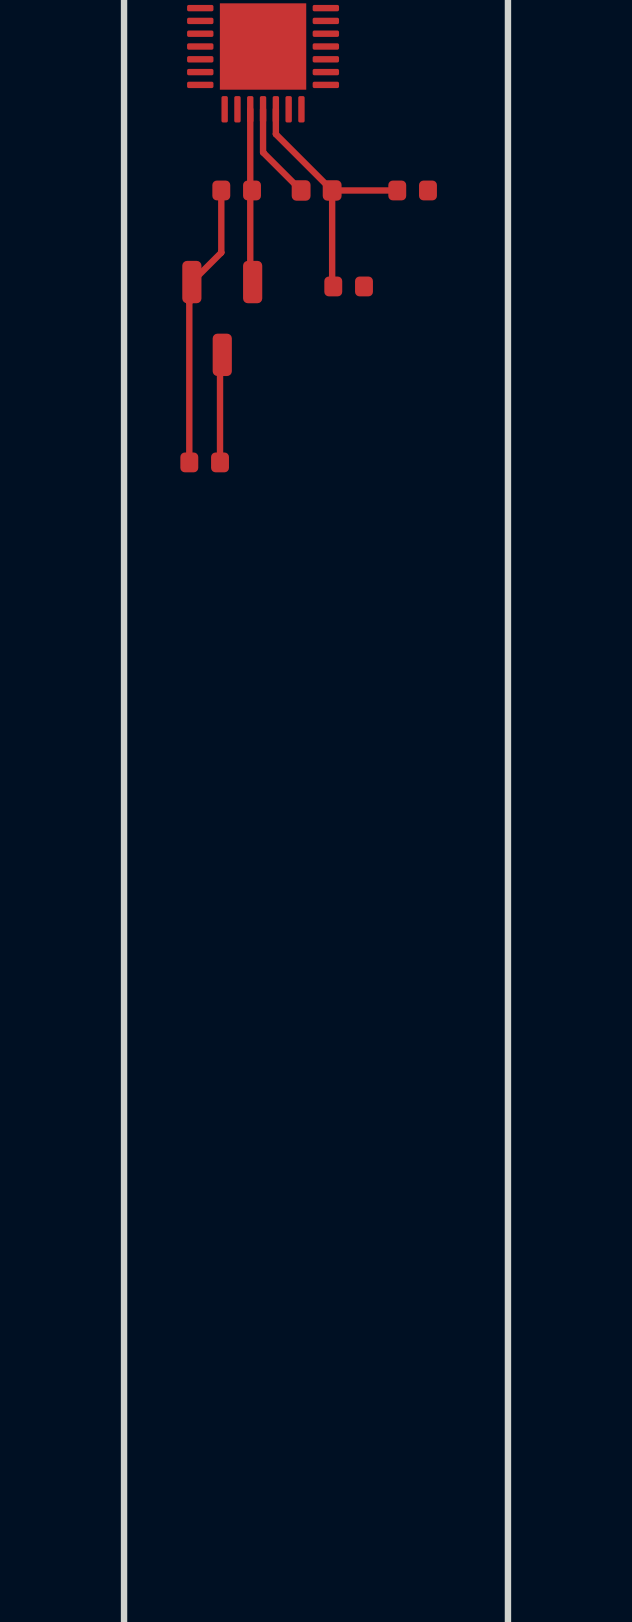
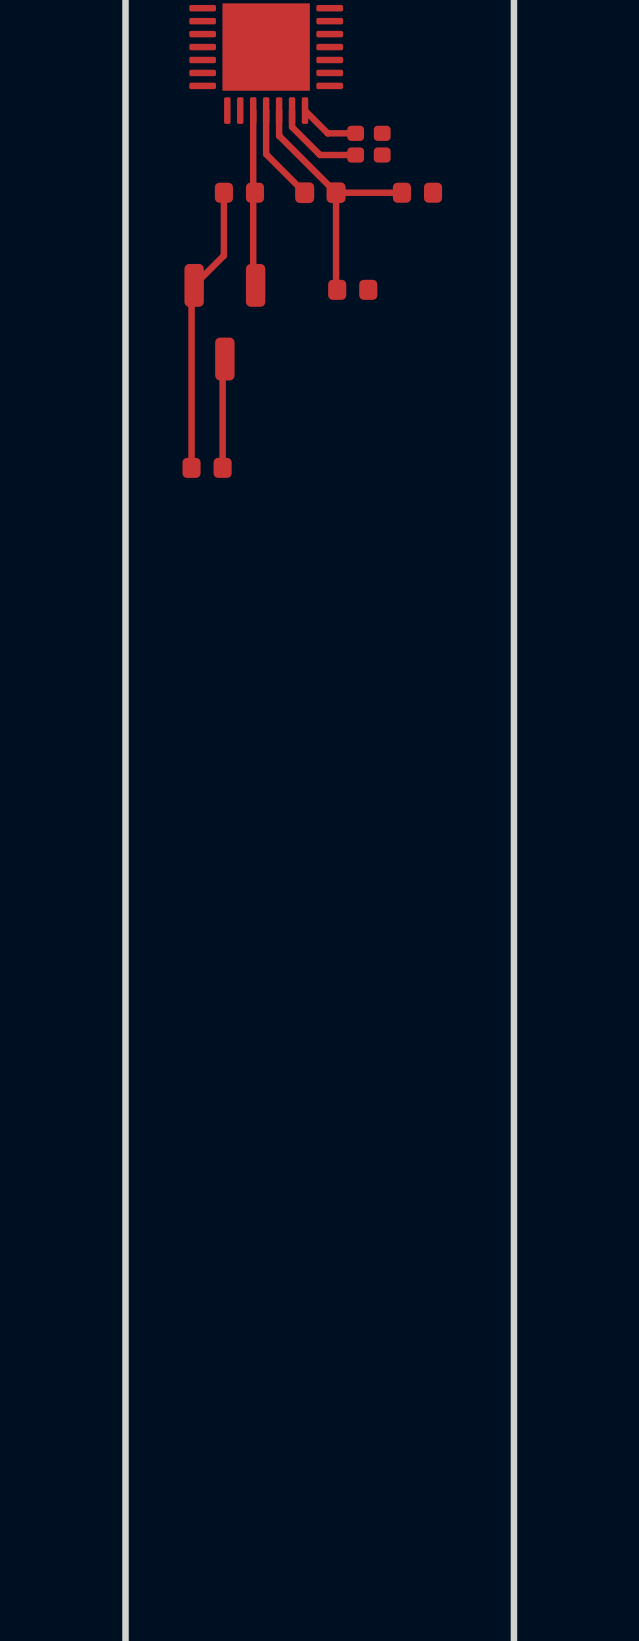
top track: none -> (292, 110) (292, 127) (320, 155) (355, 155)
top track: none -> (305, 110) (327, 133) (355, 133)
part: none -> (368, 144)

